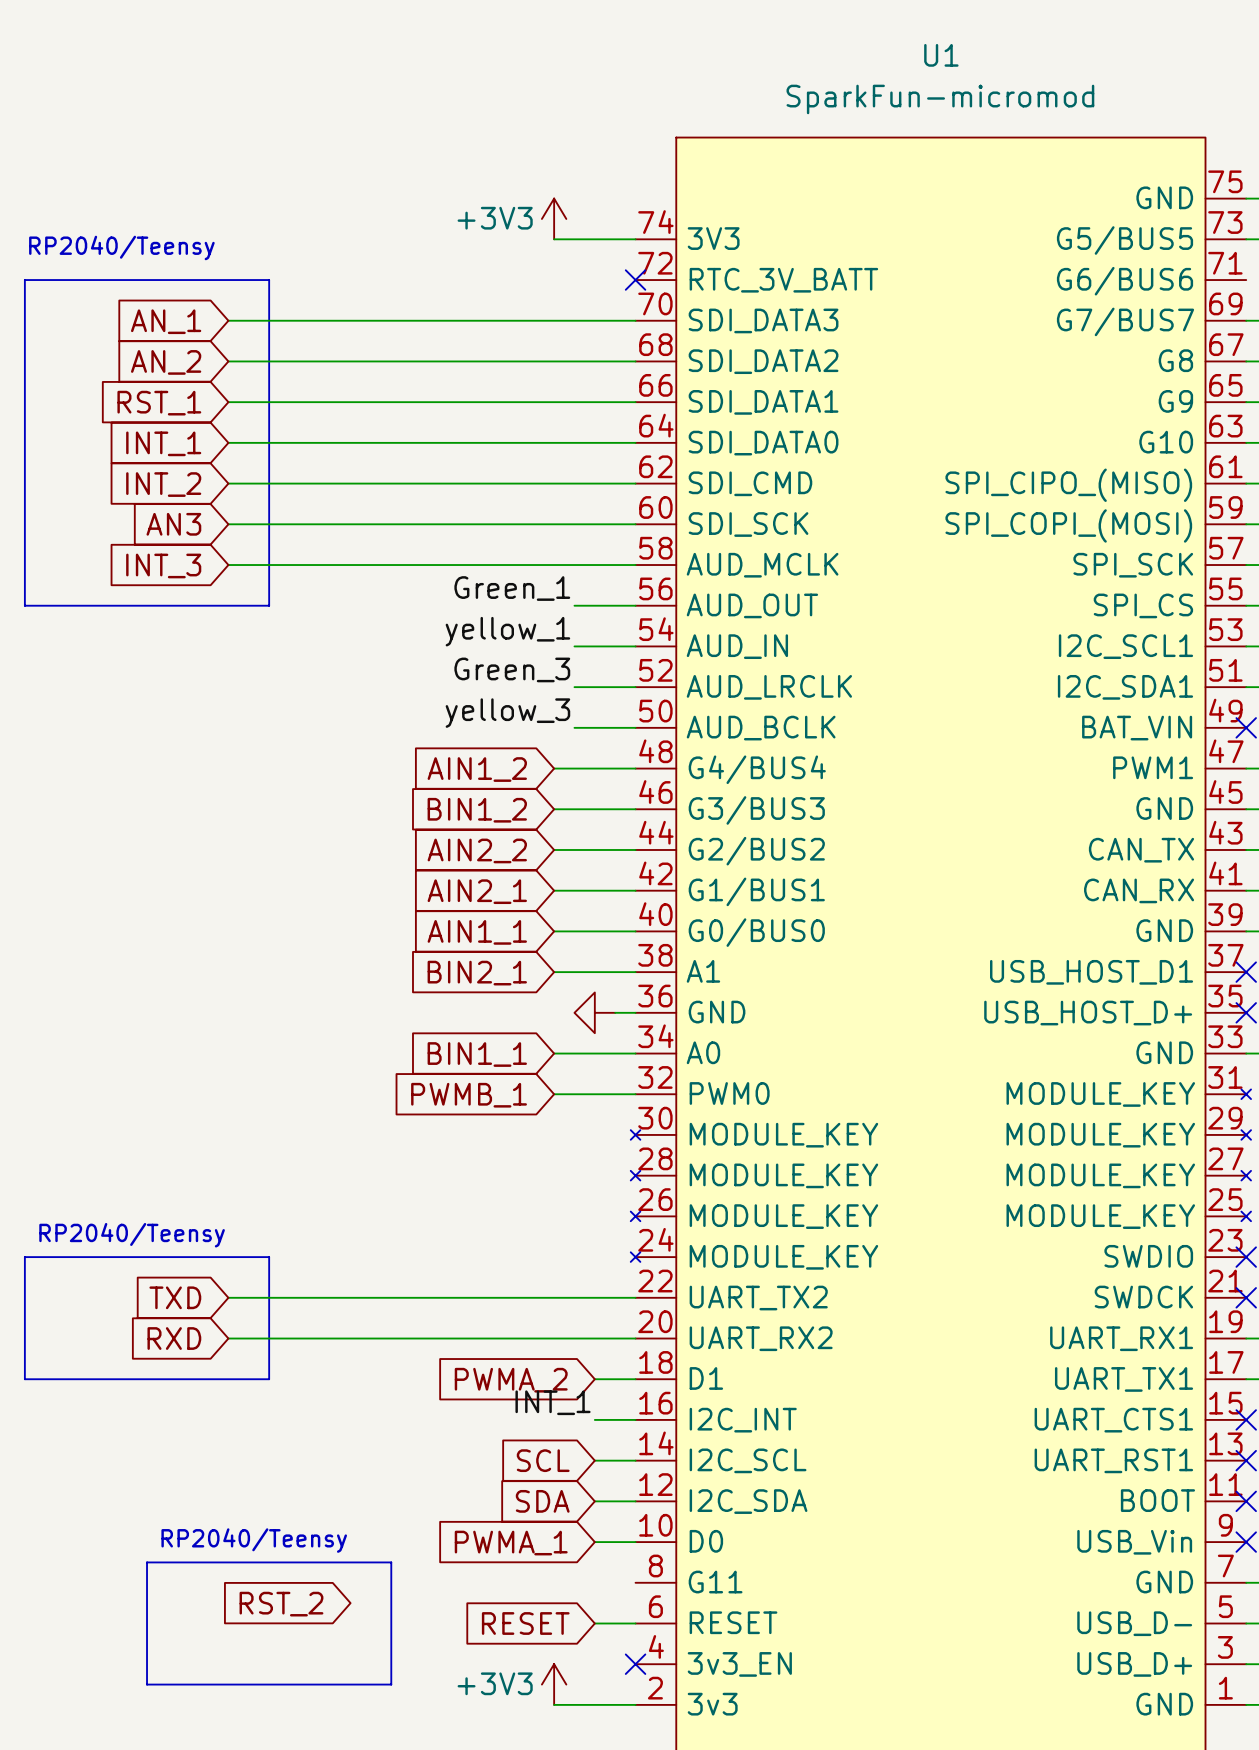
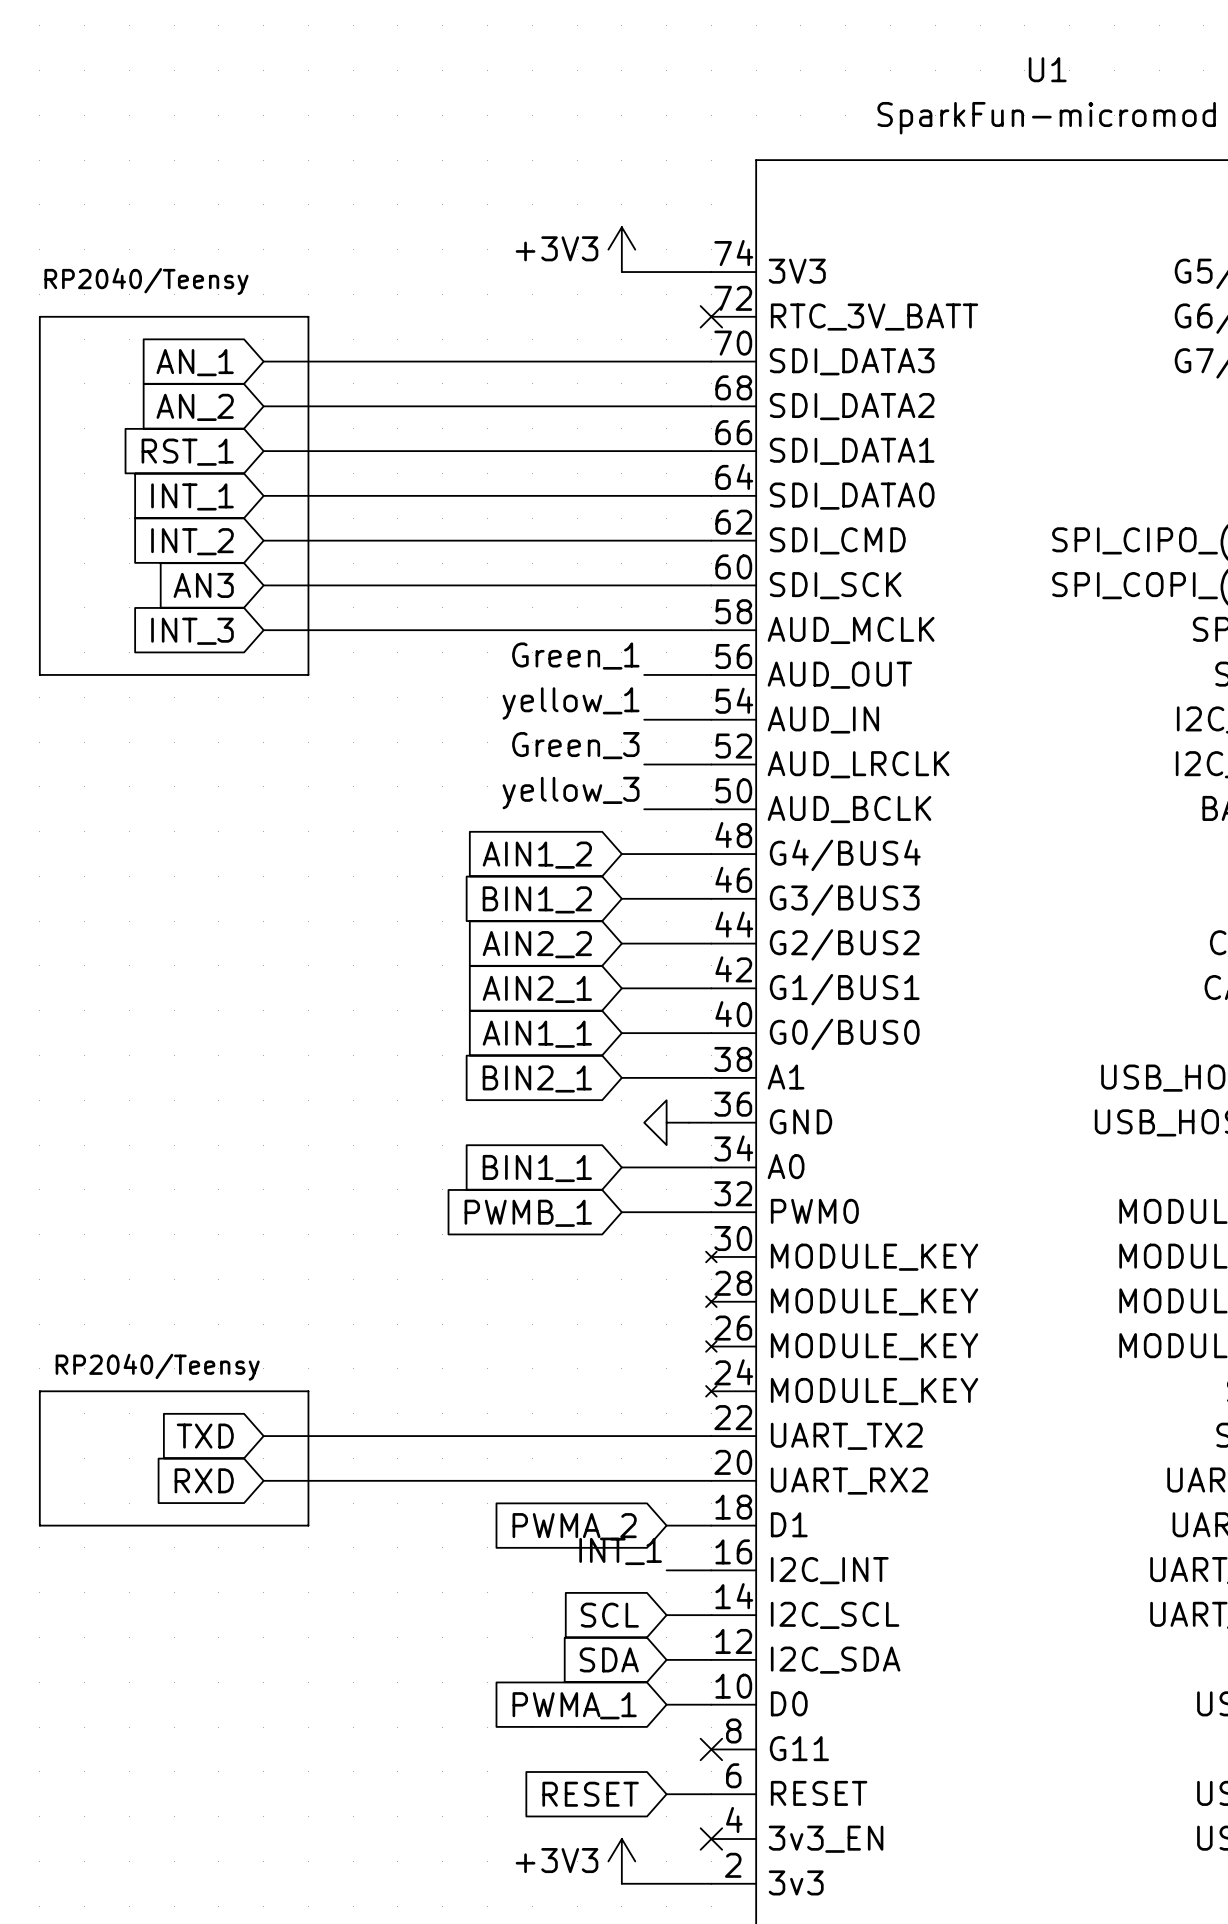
text: RP2040/Teensy (254, 1540) -> none
line: (147, 1562) (391, 1562) (391, 1684) (147, 1684) (147, 1562) -> none
no-connect mark: none -> (711, 1749)
global label: RST_2 (281, 1604) -> none

